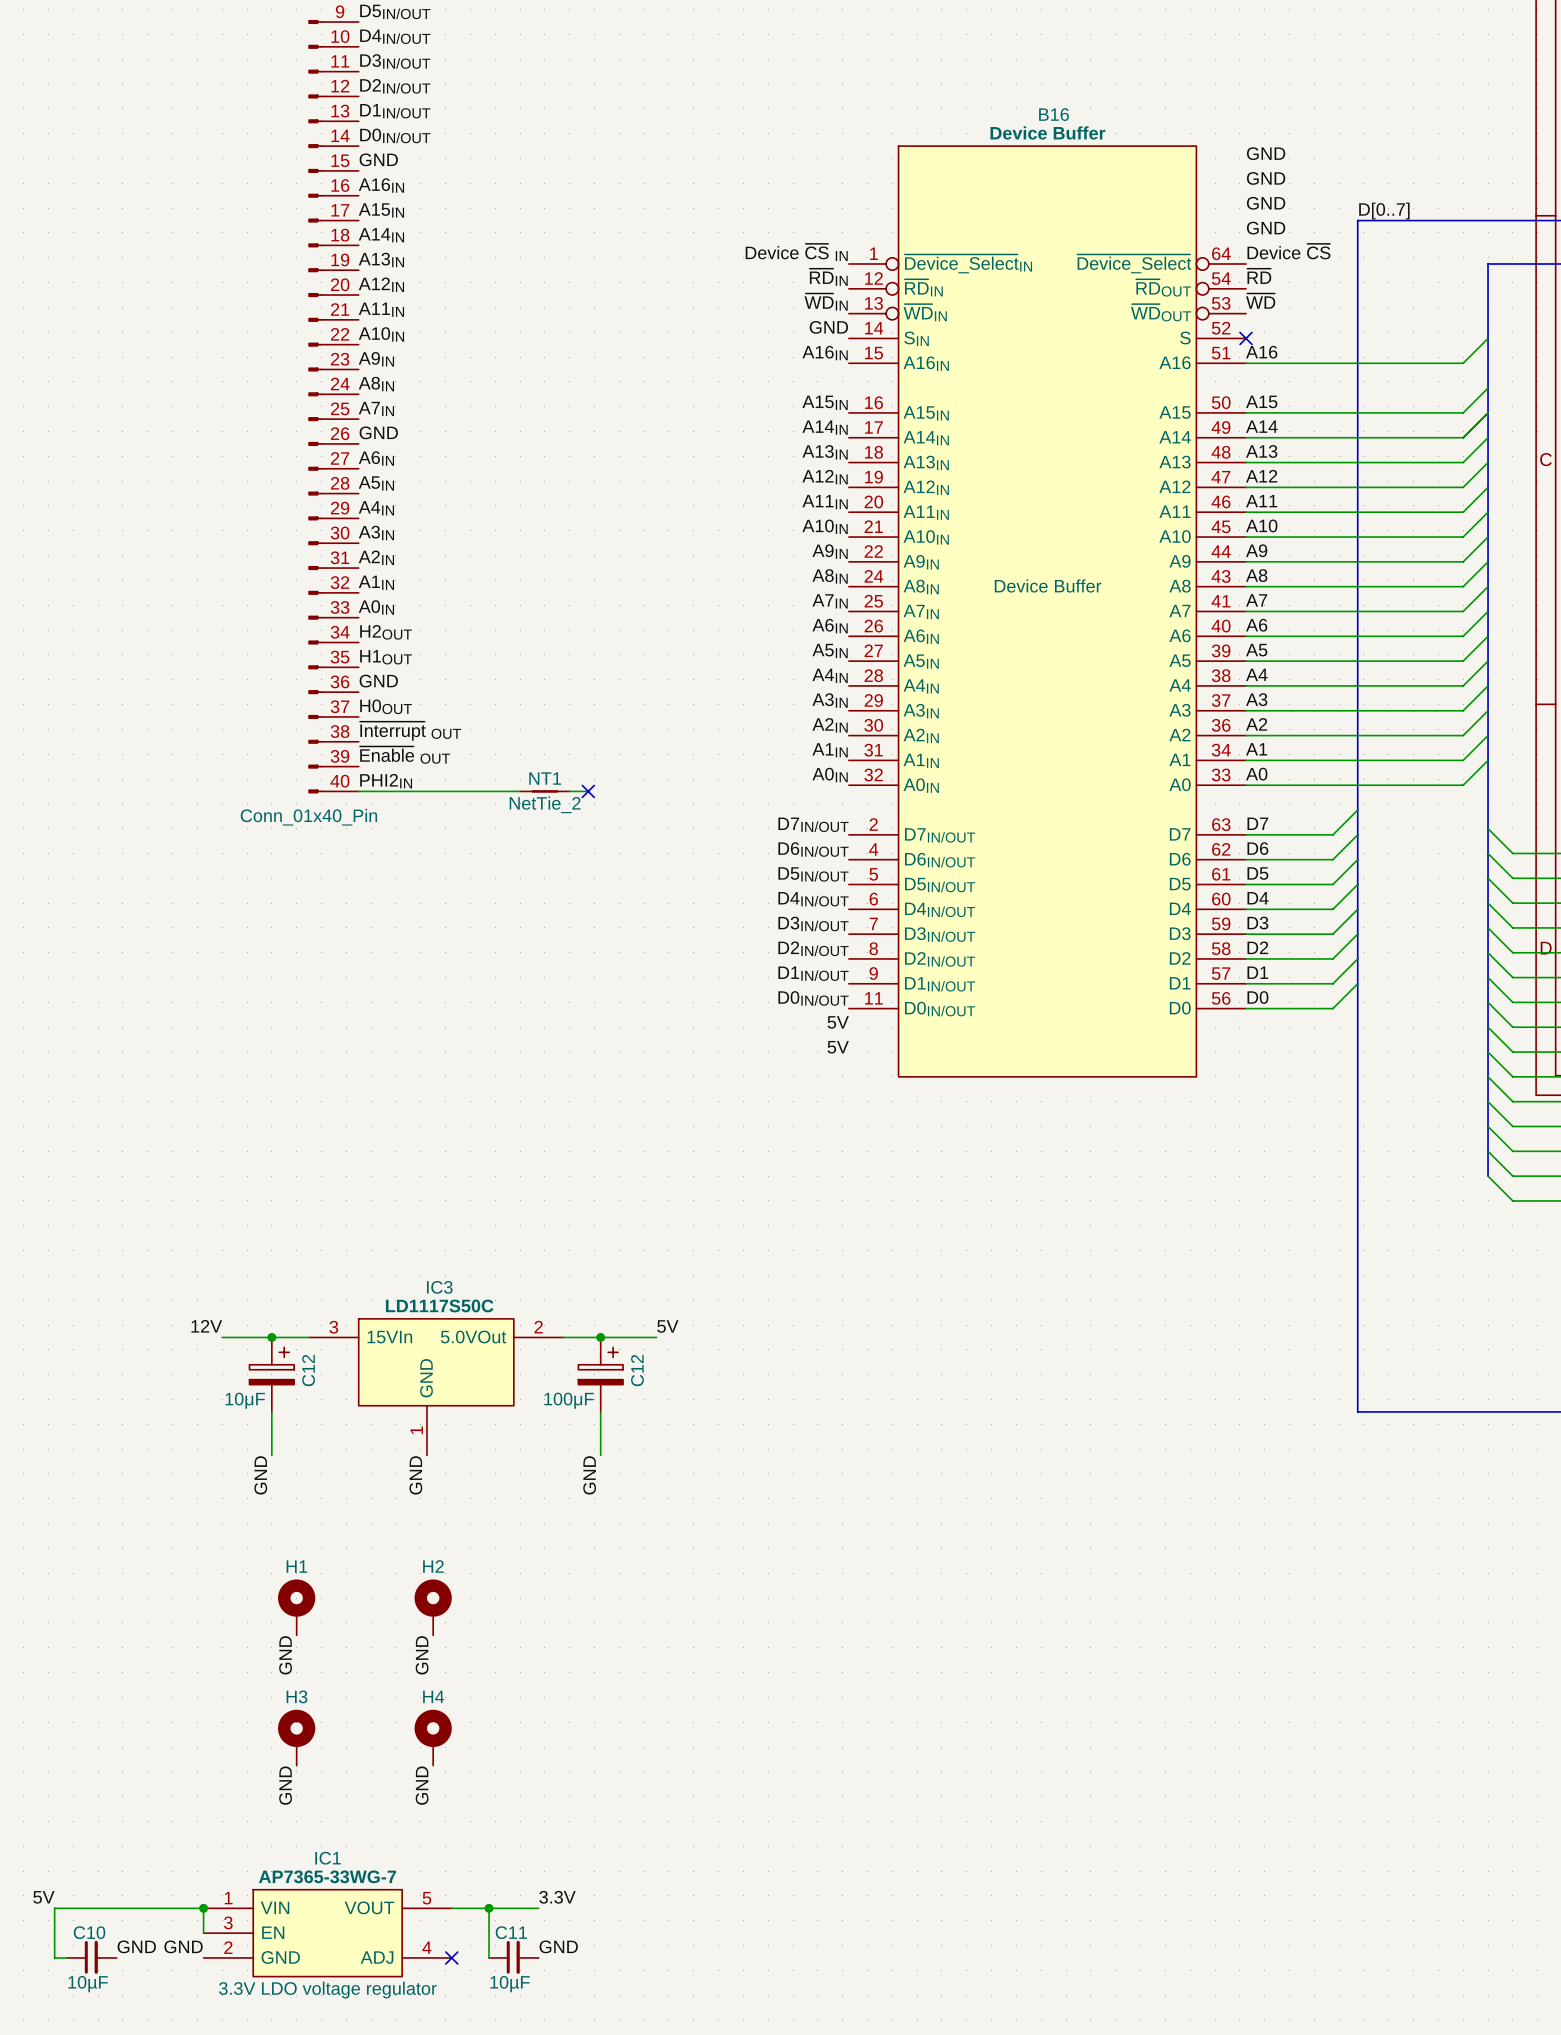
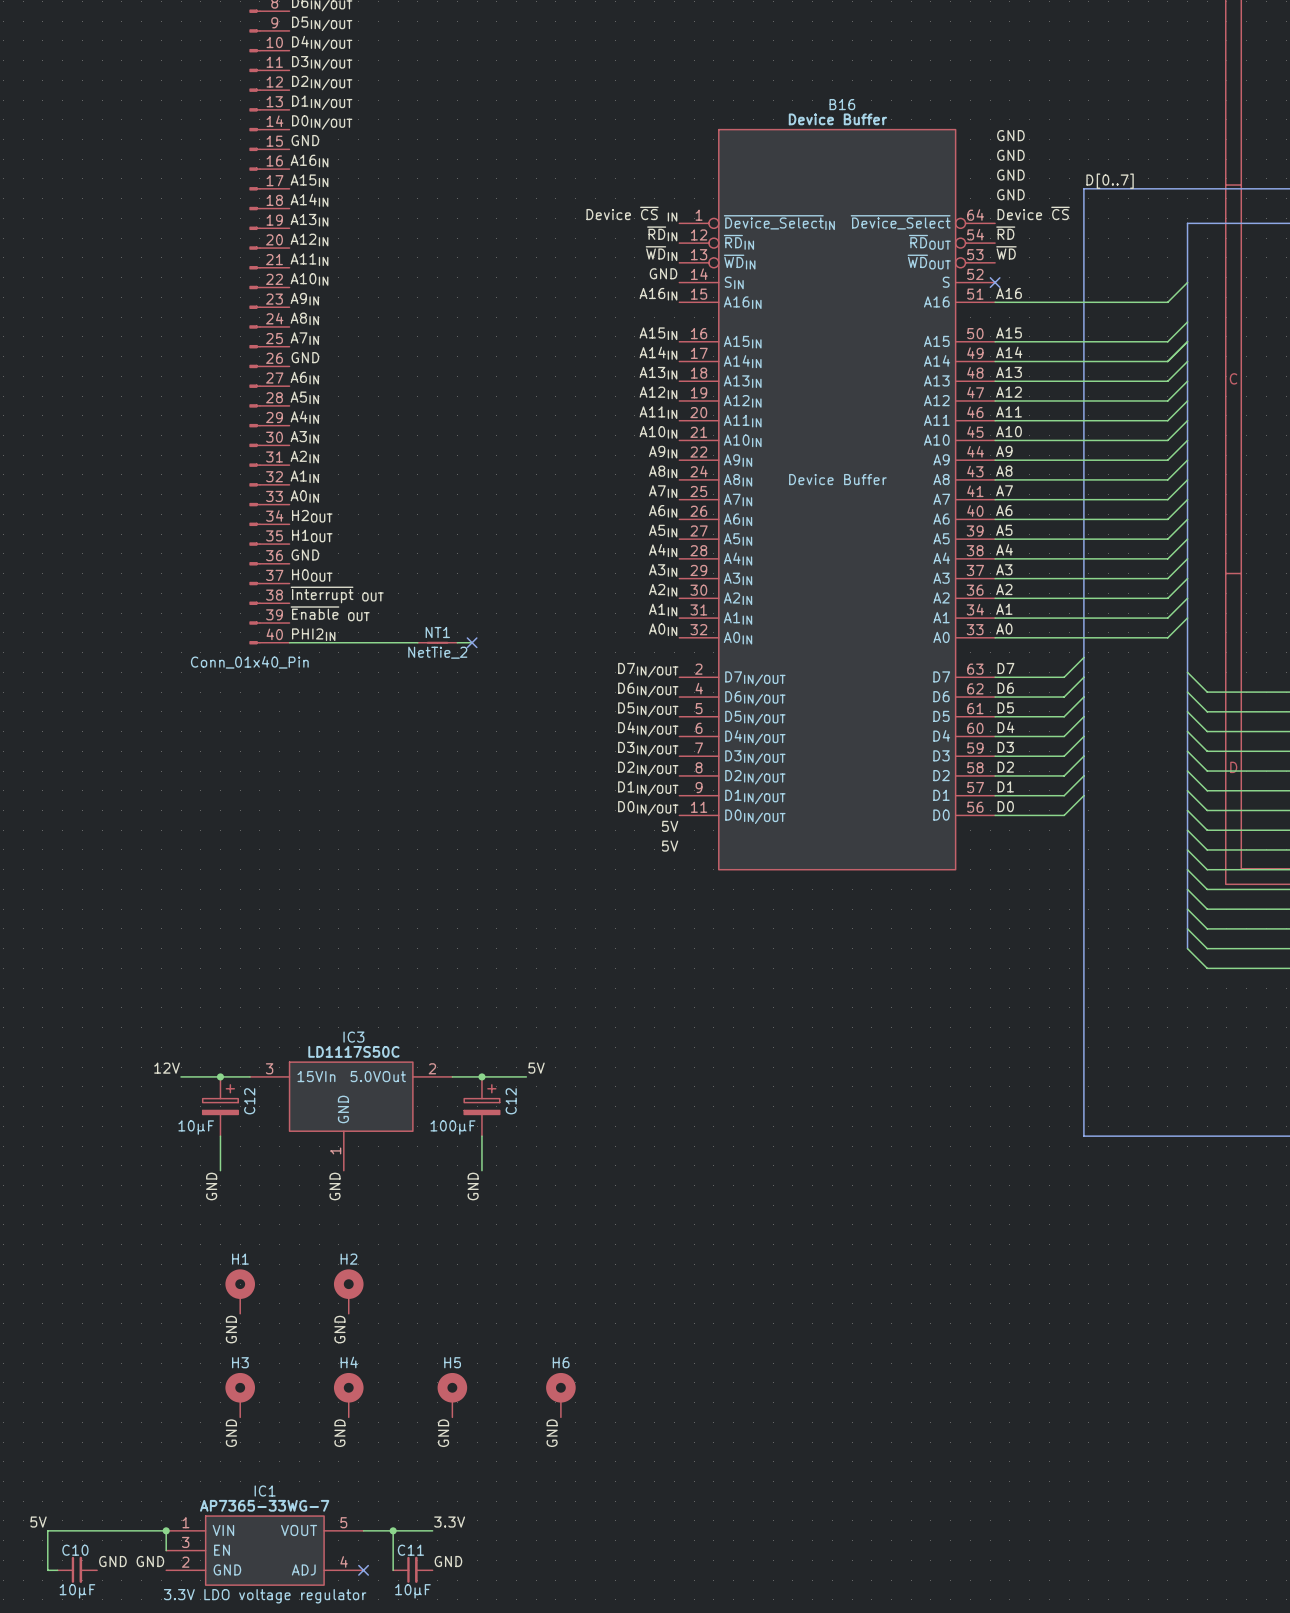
H5: none -> (452, 1395)
H6: none -> (560, 1395)
label: none -> GND (443, 1433)
label: none -> GND (552, 1433)

